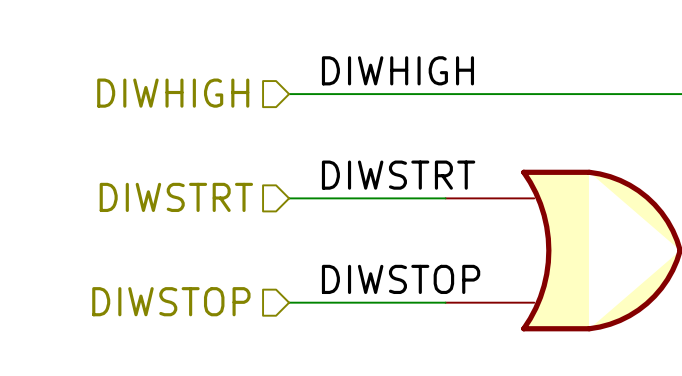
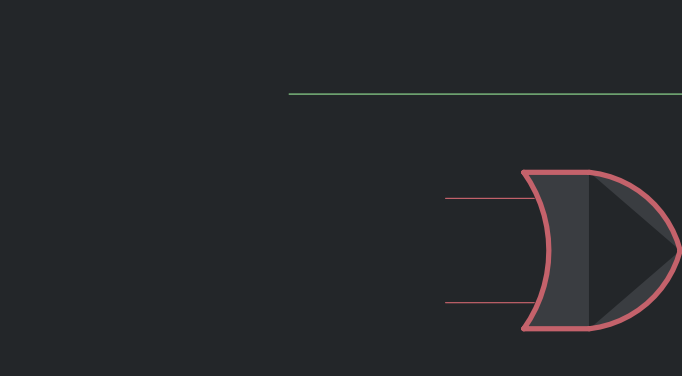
label: DIWHIGH (397, 70) -> none
hierarchical label: DIWHIGH (173, 93) -> none
label: DIWSTRT (398, 175) -> none
hierarchical label: DIWSTRT (176, 197) -> none
wire: (289, 198) (445, 198) -> none
label: DIWSTOP (401, 279) -> none
hierarchical label: DIWSTOP (171, 301) -> none
wire: (289, 302) (445, 302) -> none

